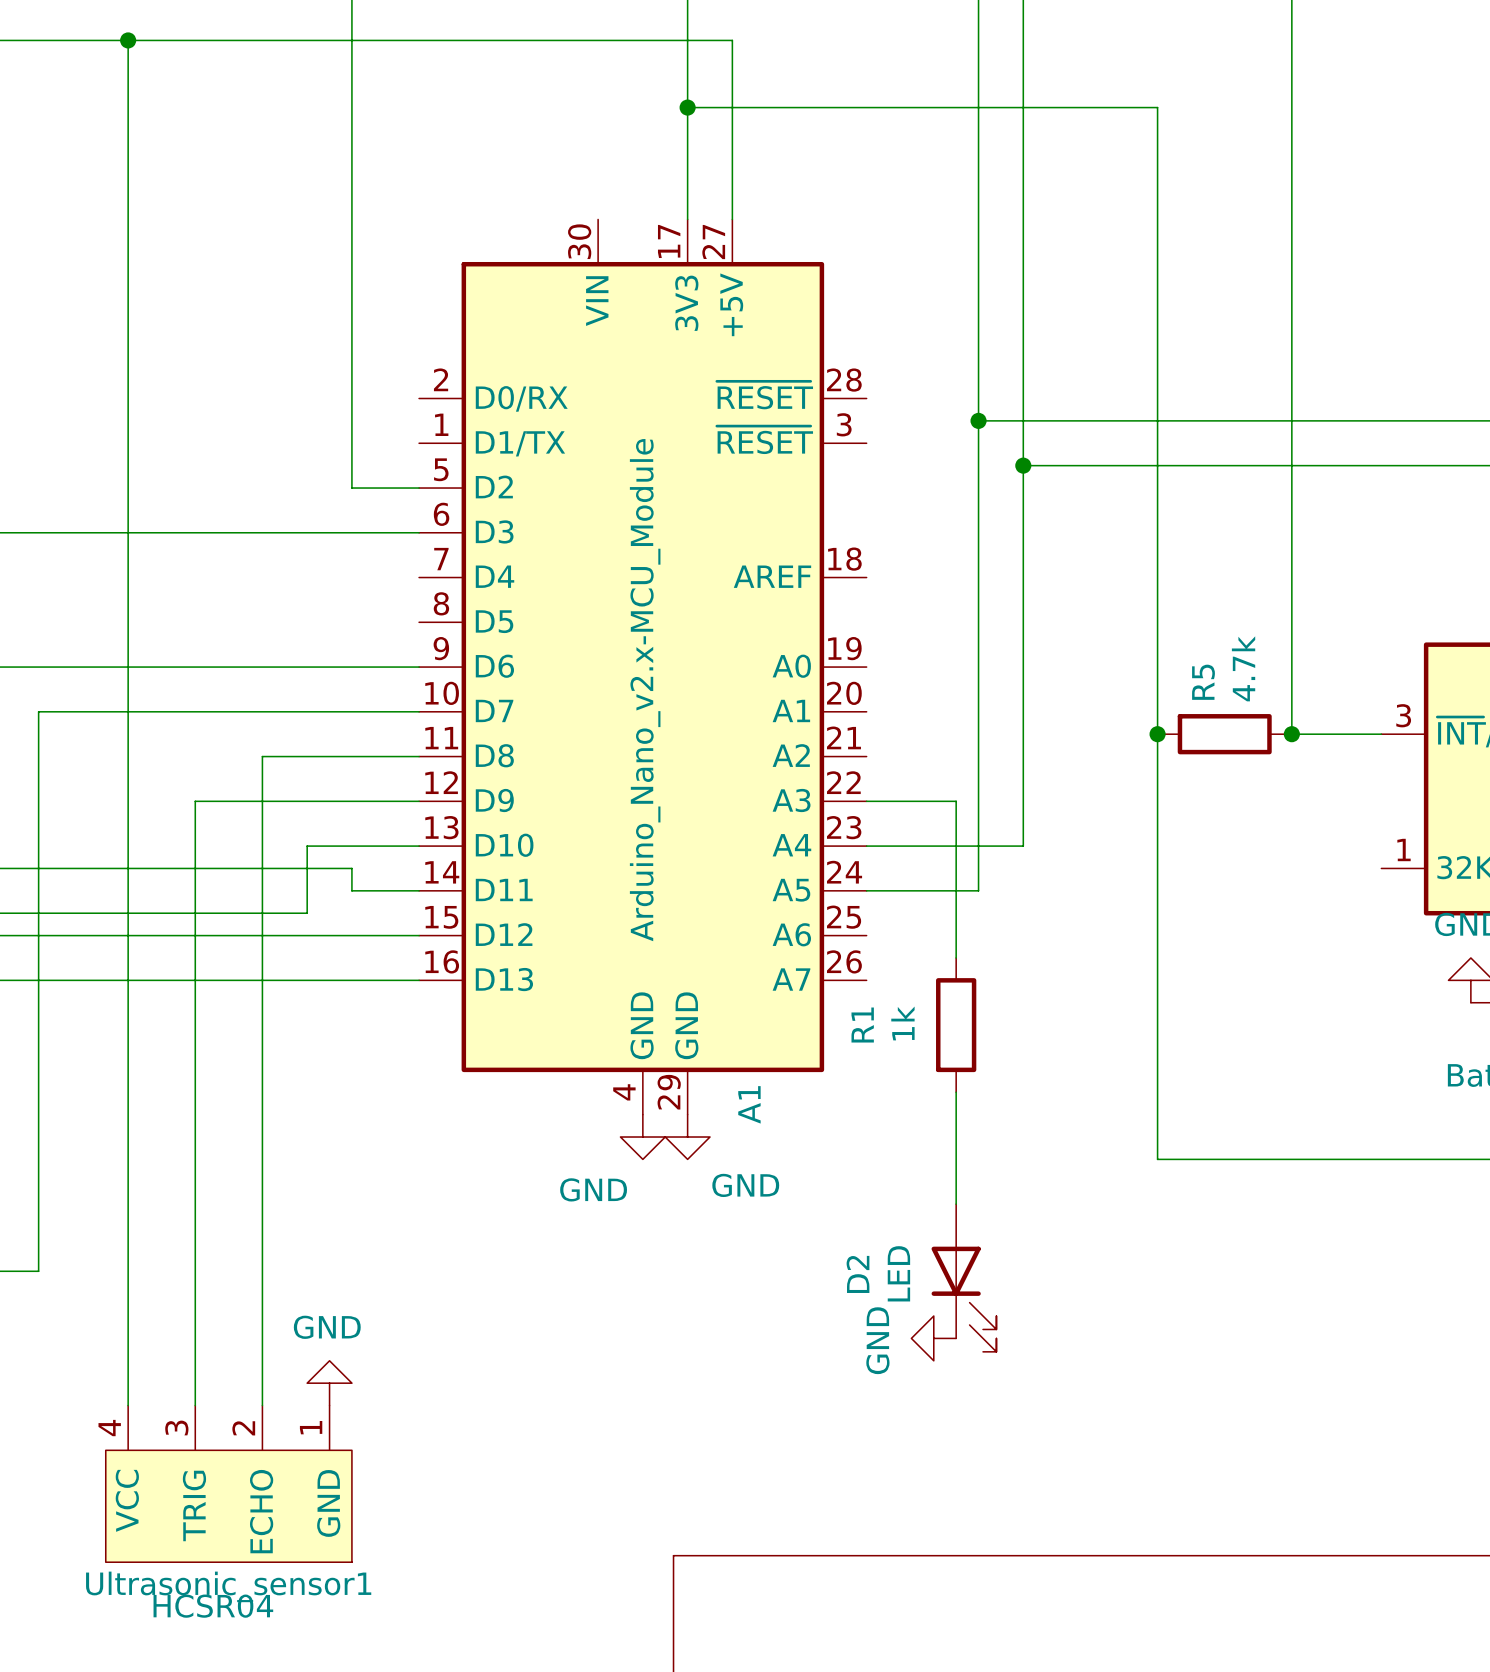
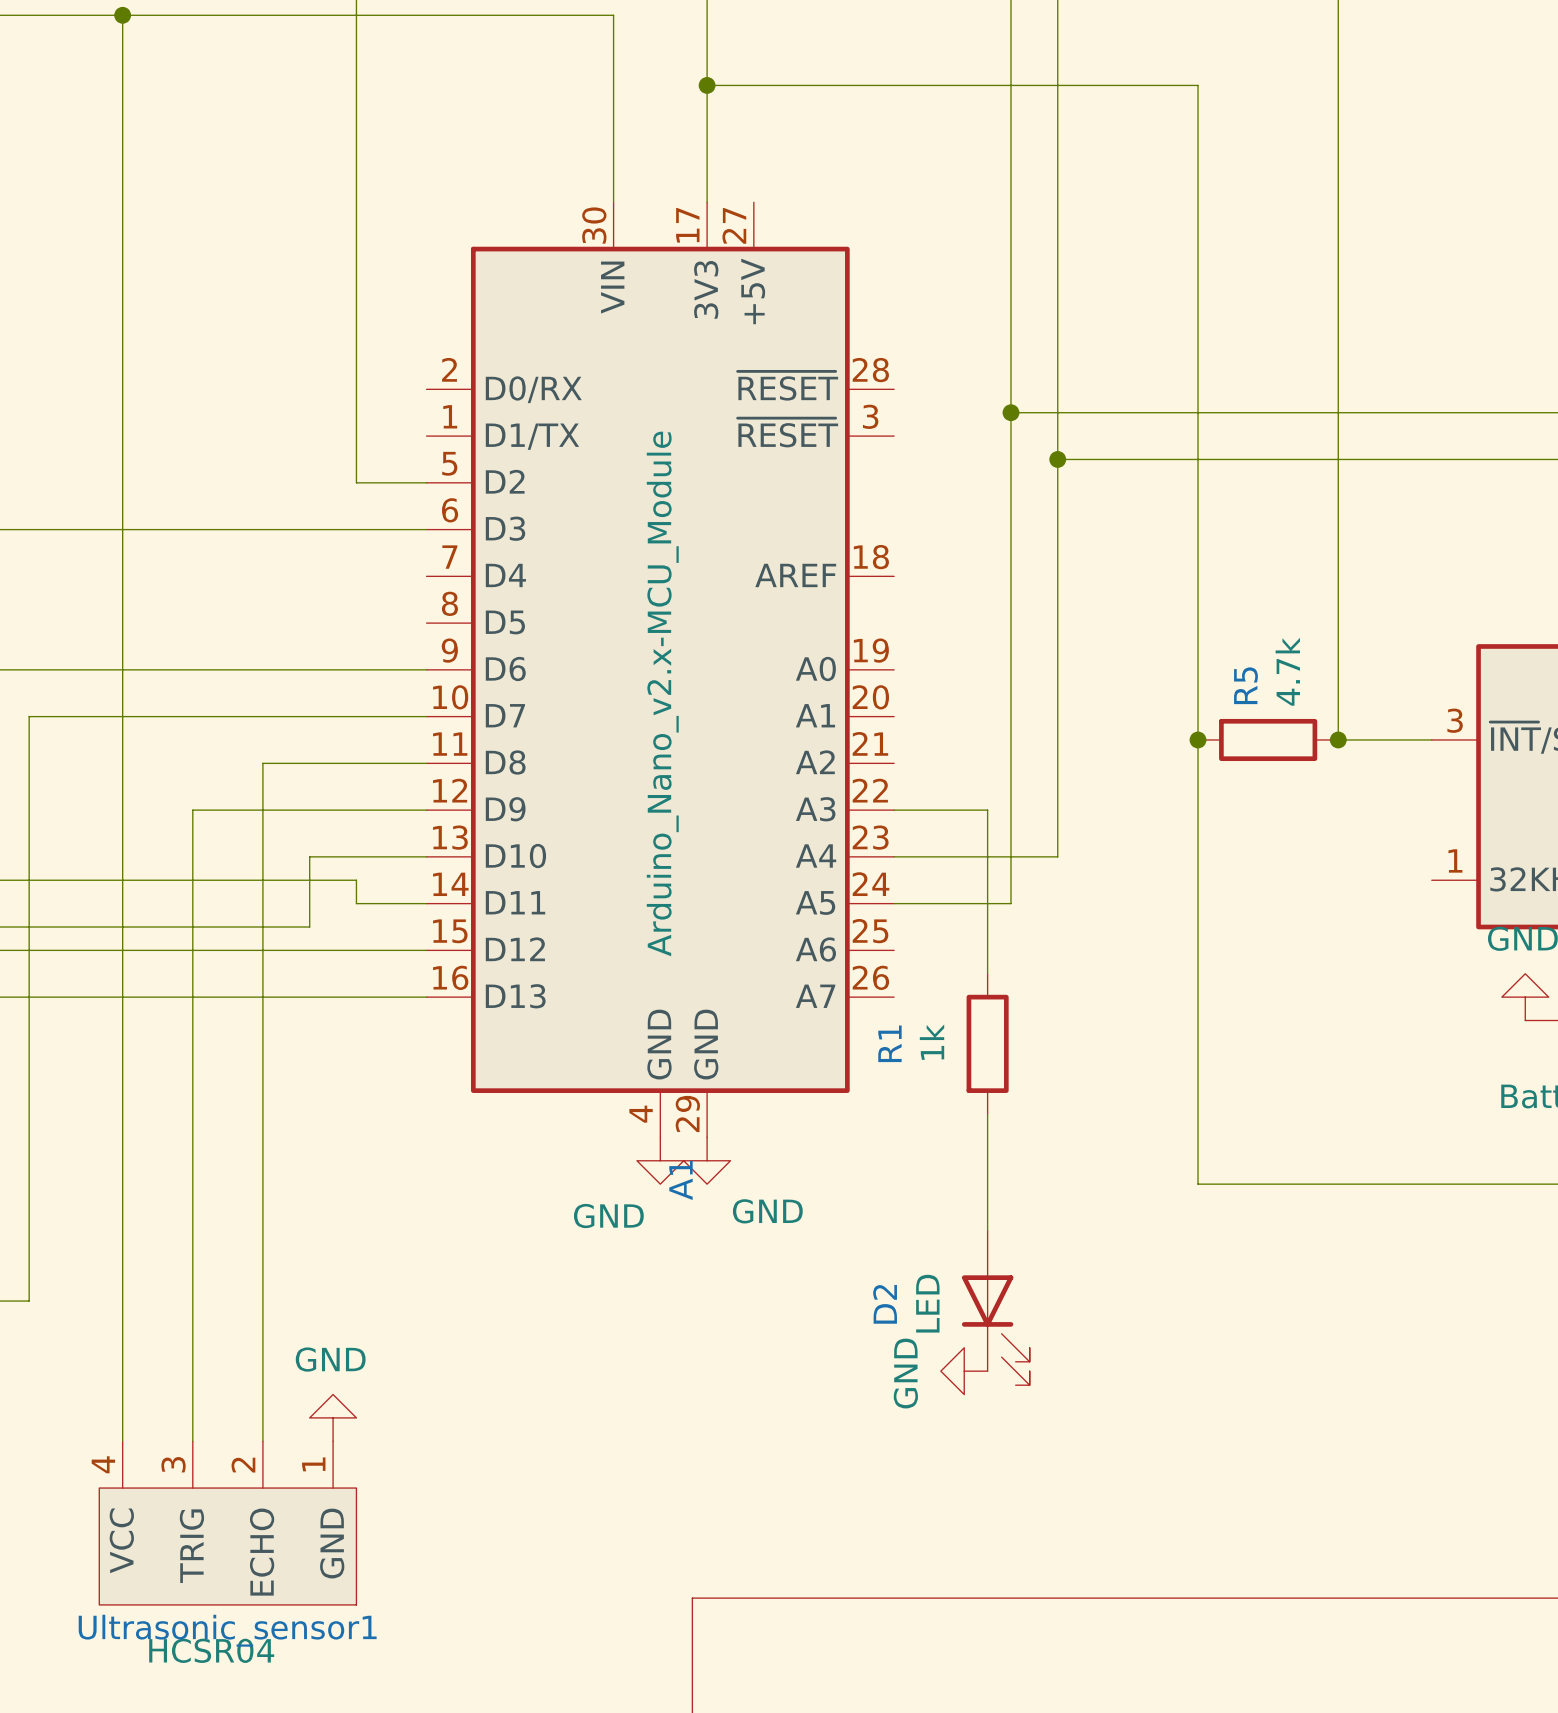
wire: (598, 40) (732, 40) (732, 219) -> (613, 15) (613, 202)
A1 name position: A1 (749, 1104) -> A1 (680, 1180)

